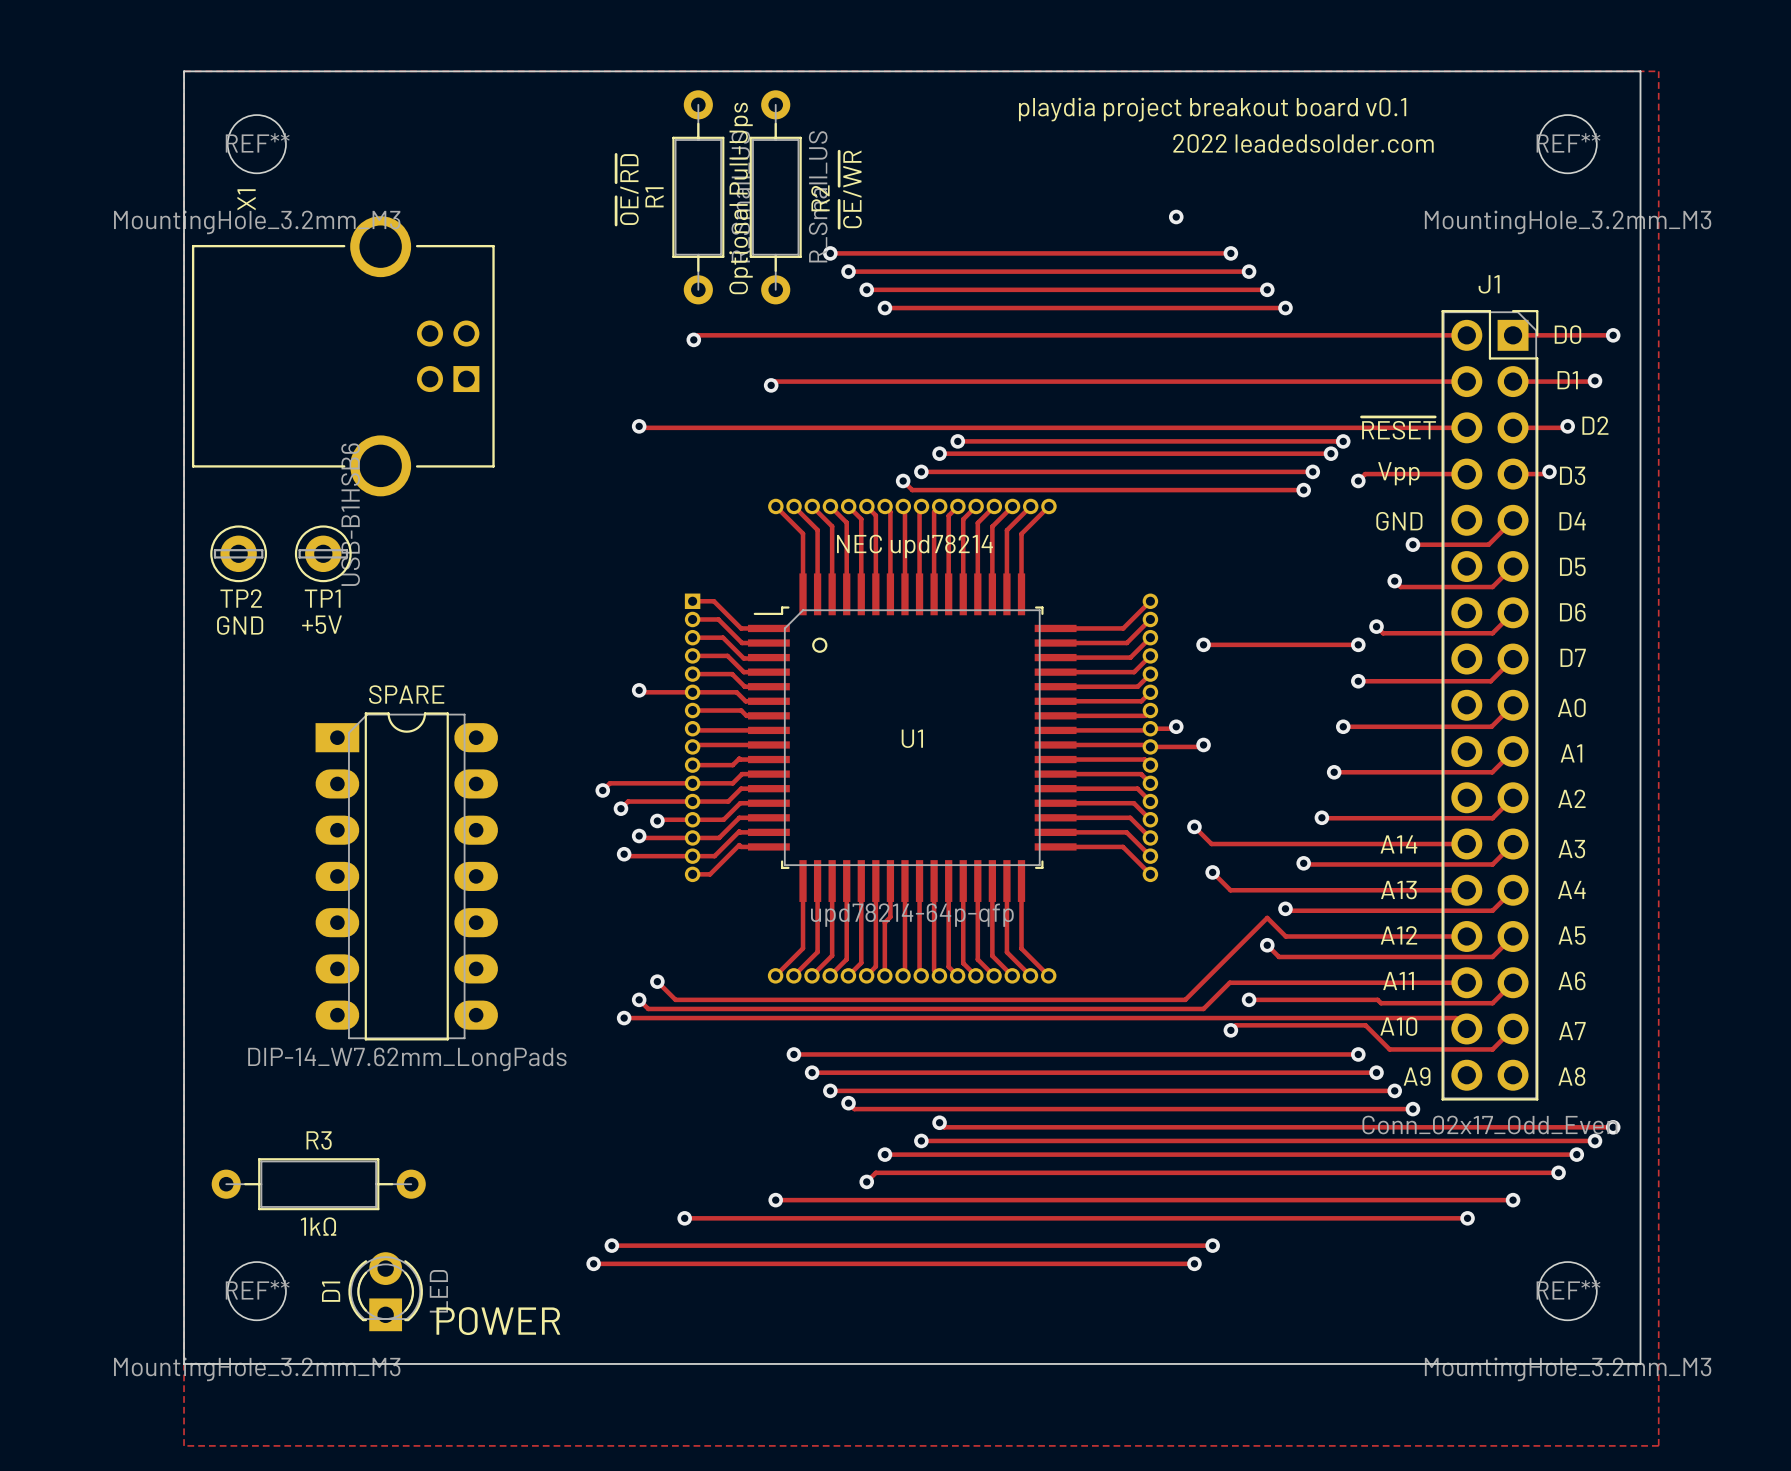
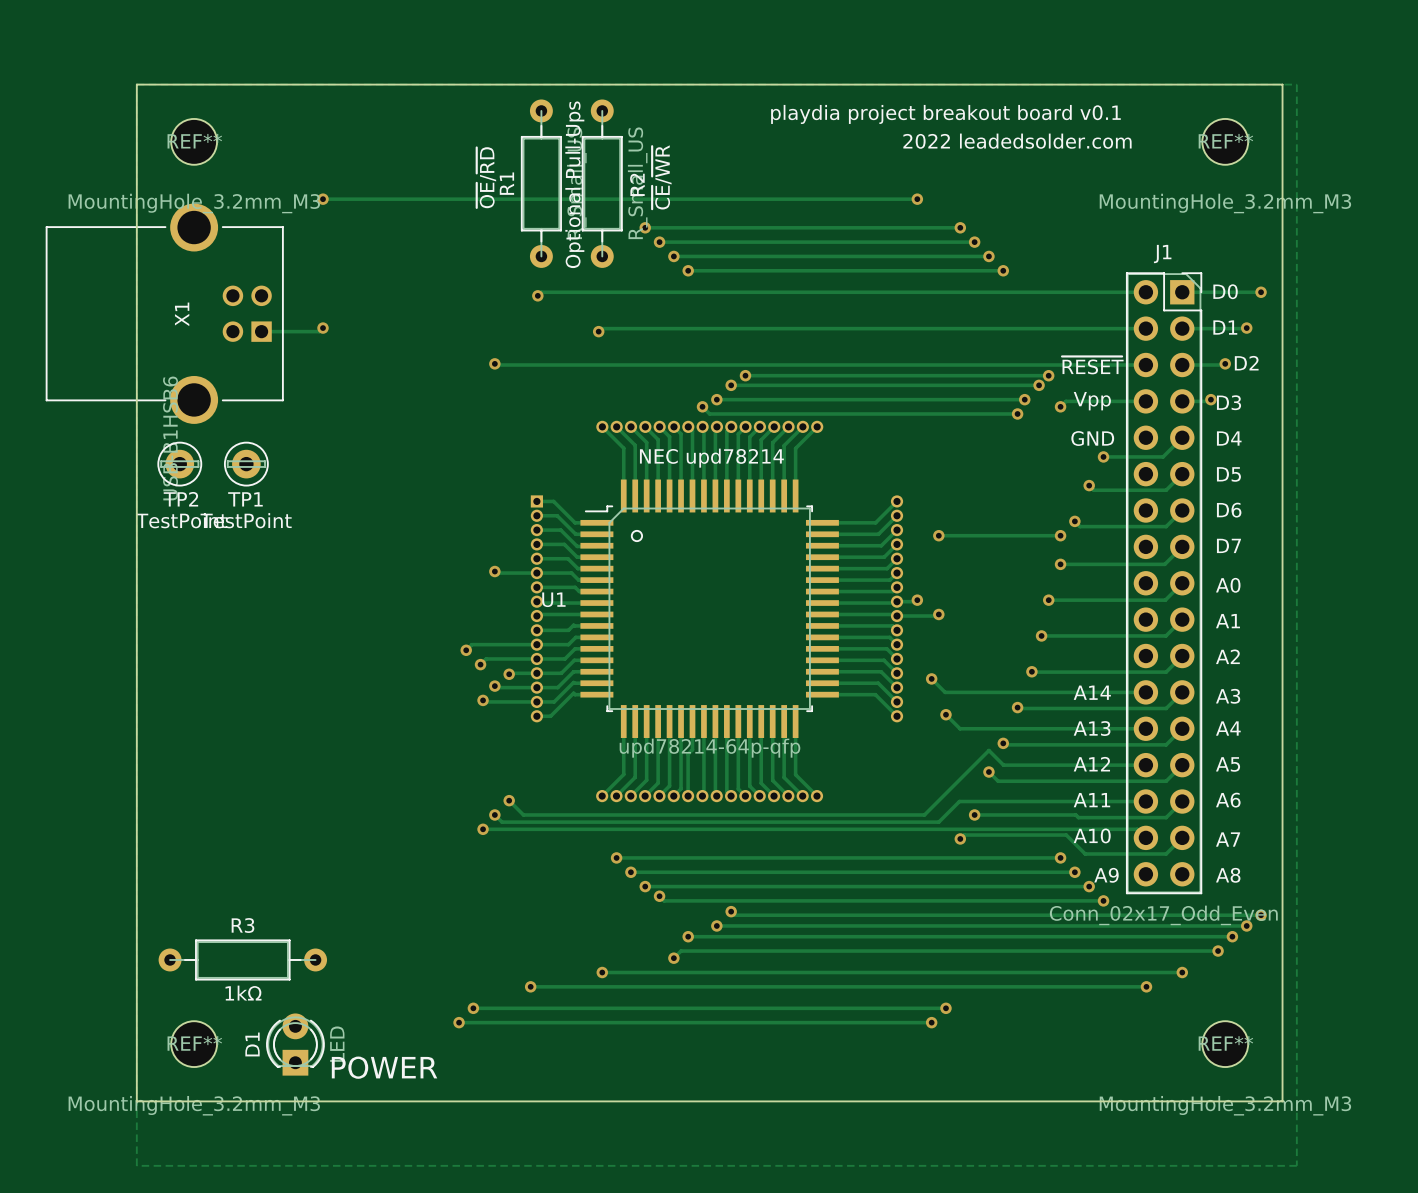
X1 name position: X1 (246, 199) -> X1 (182, 314)
track: none -> (323, 199) (917, 199)
via: none -> (323, 199)
X1 position: (343, 356) -> (164, 313)
track: none -> (323, 328) (319, 331) (261, 331)
via: none -> (323, 328)
text: +5V (322, 624) -> none
text: GND (240, 625) -> none
TP2 value: none -> TestPoint (181, 520)
TP1 value: none -> TestPoint (246, 520)
U1 name position: U1 (912, 738) -> U1 (553, 599)
SPARE: DIP-14_W7.62mm_LongPads (406, 876) -> none

